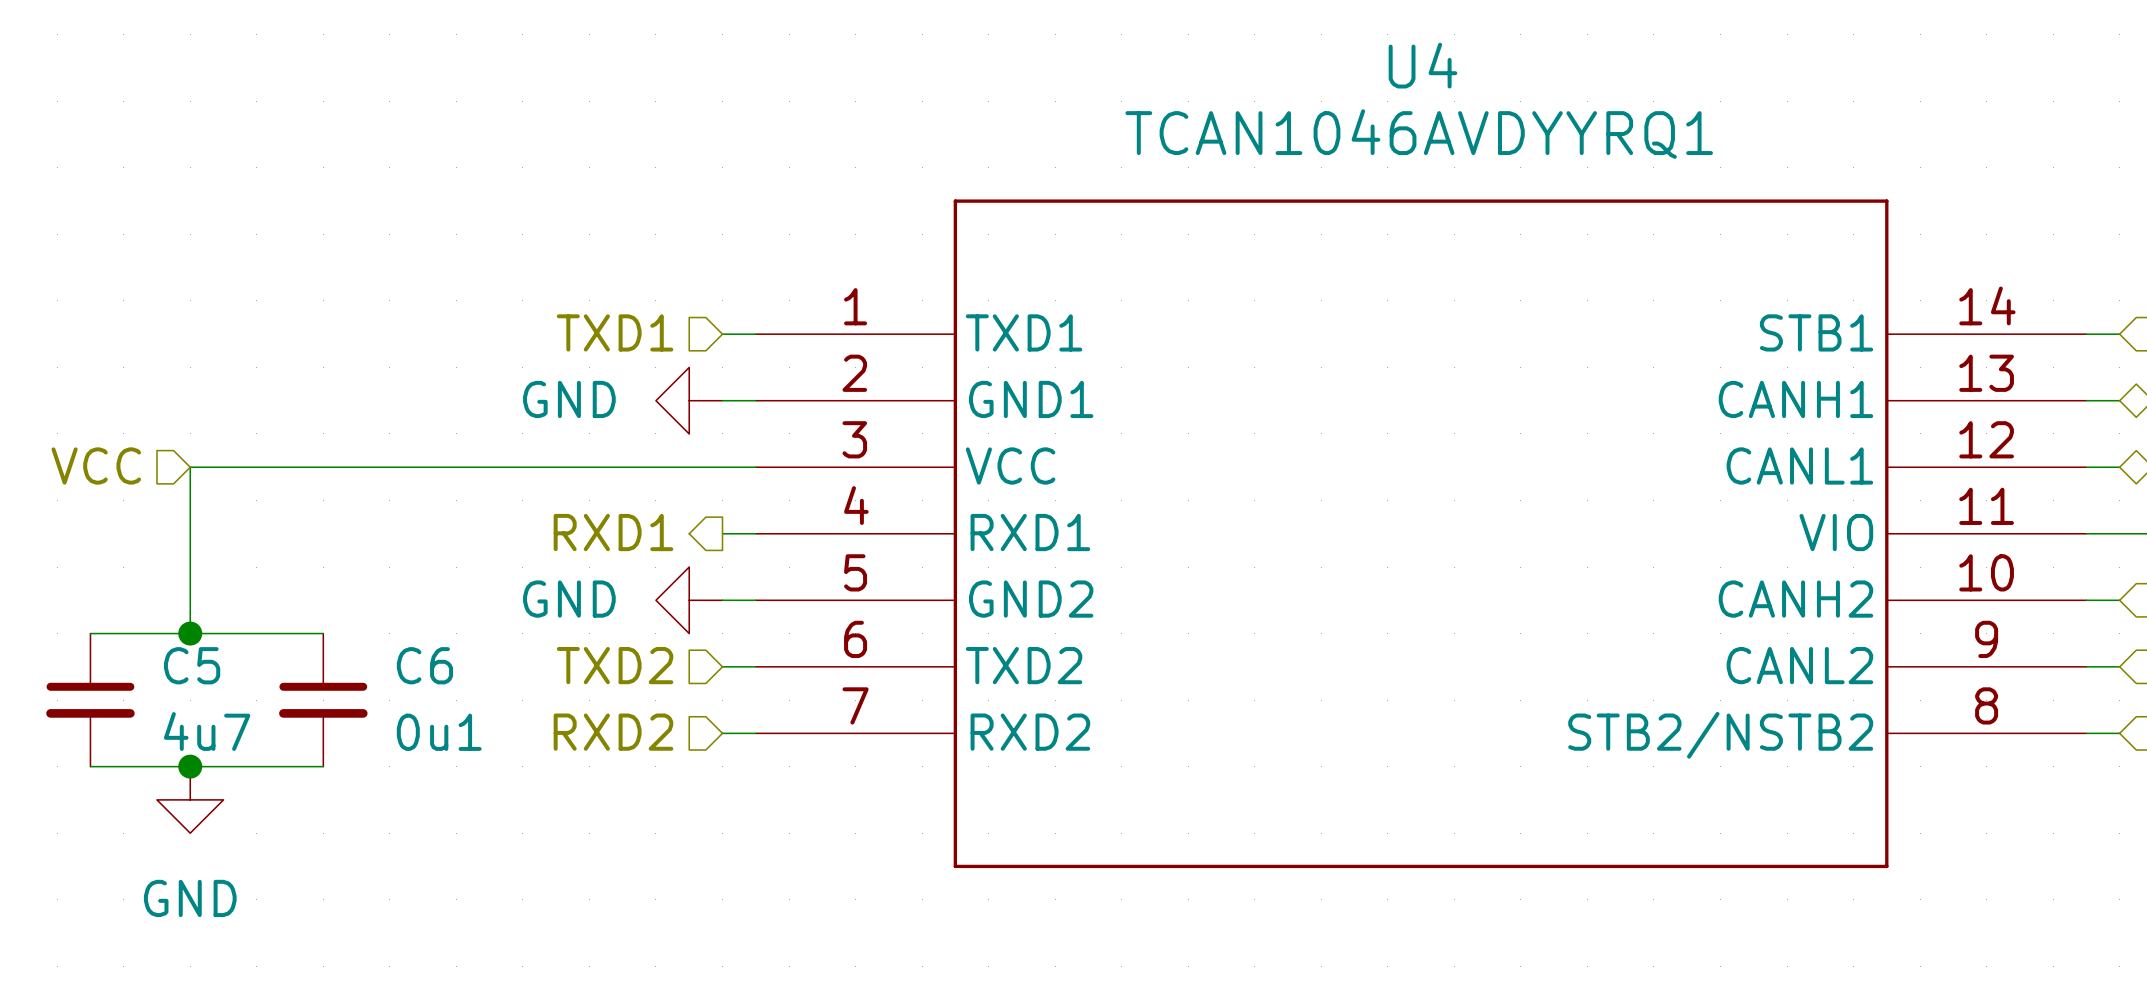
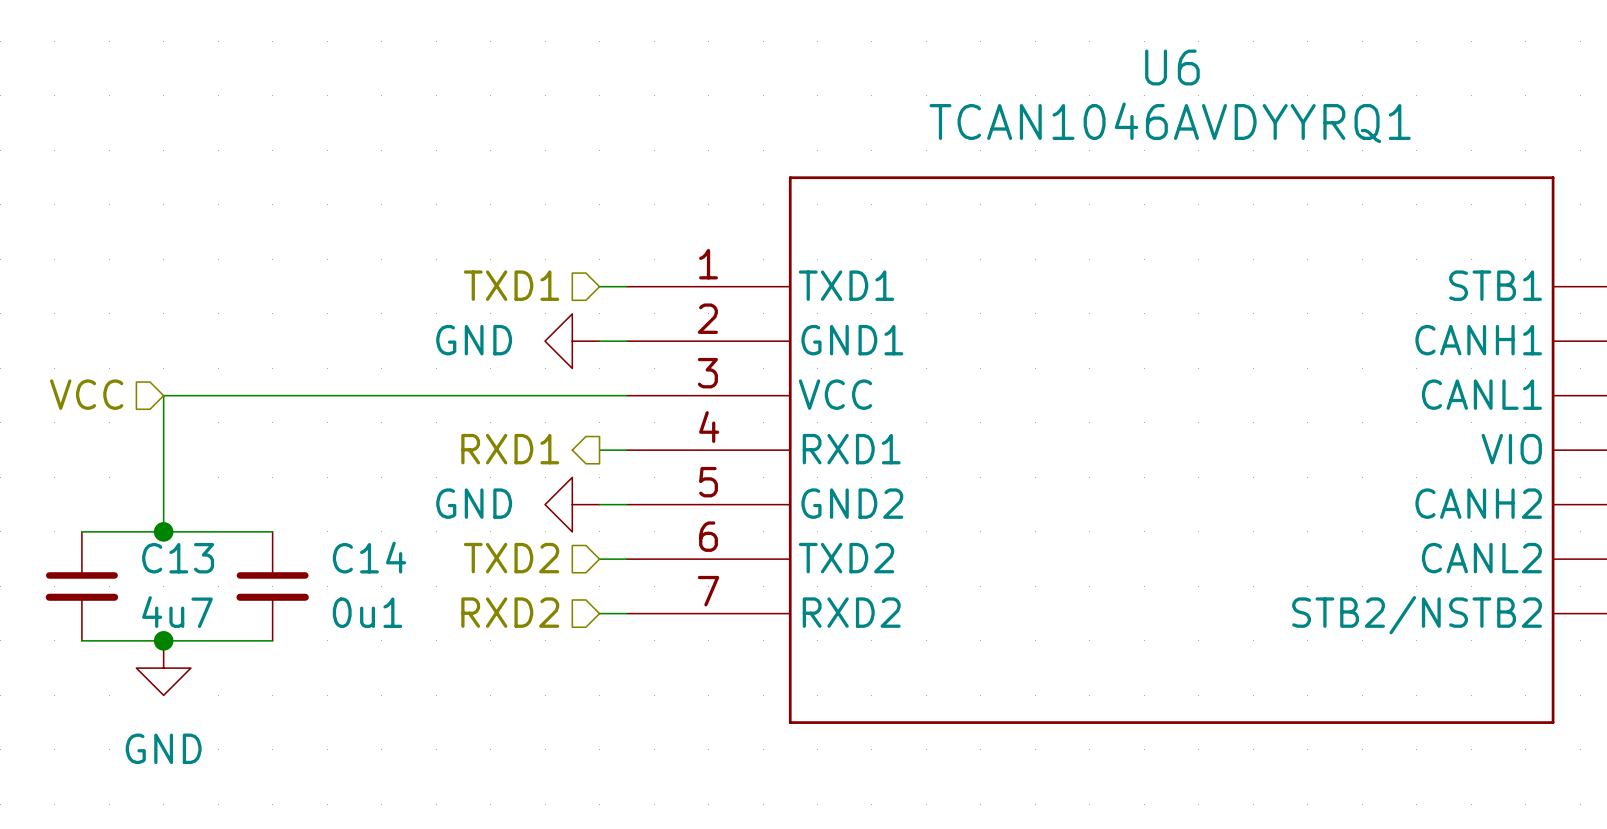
U4 name: U4 (1422, 65) -> U6 (1172, 67)
C5 name: C5 (192, 665) -> C13 (178, 558)
C6 name: C6 (424, 665) -> C14 (369, 557)

